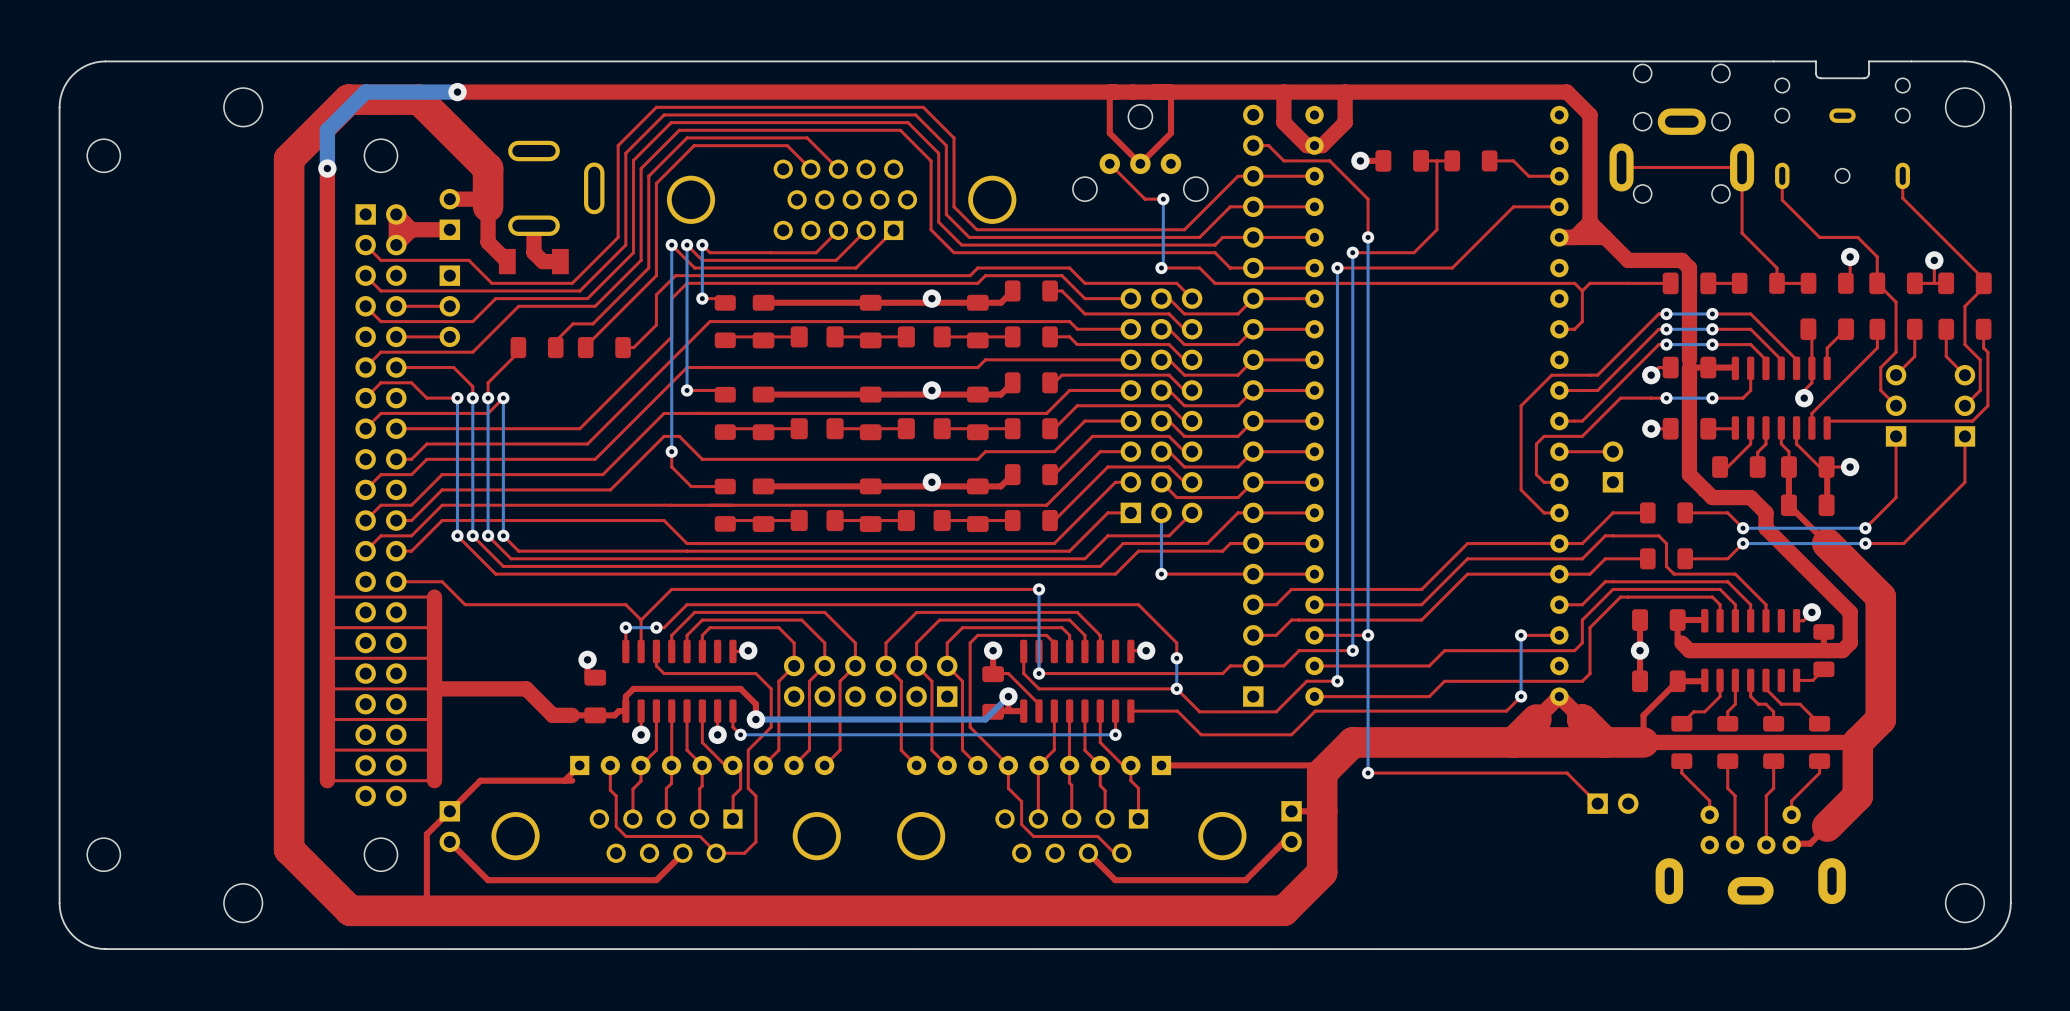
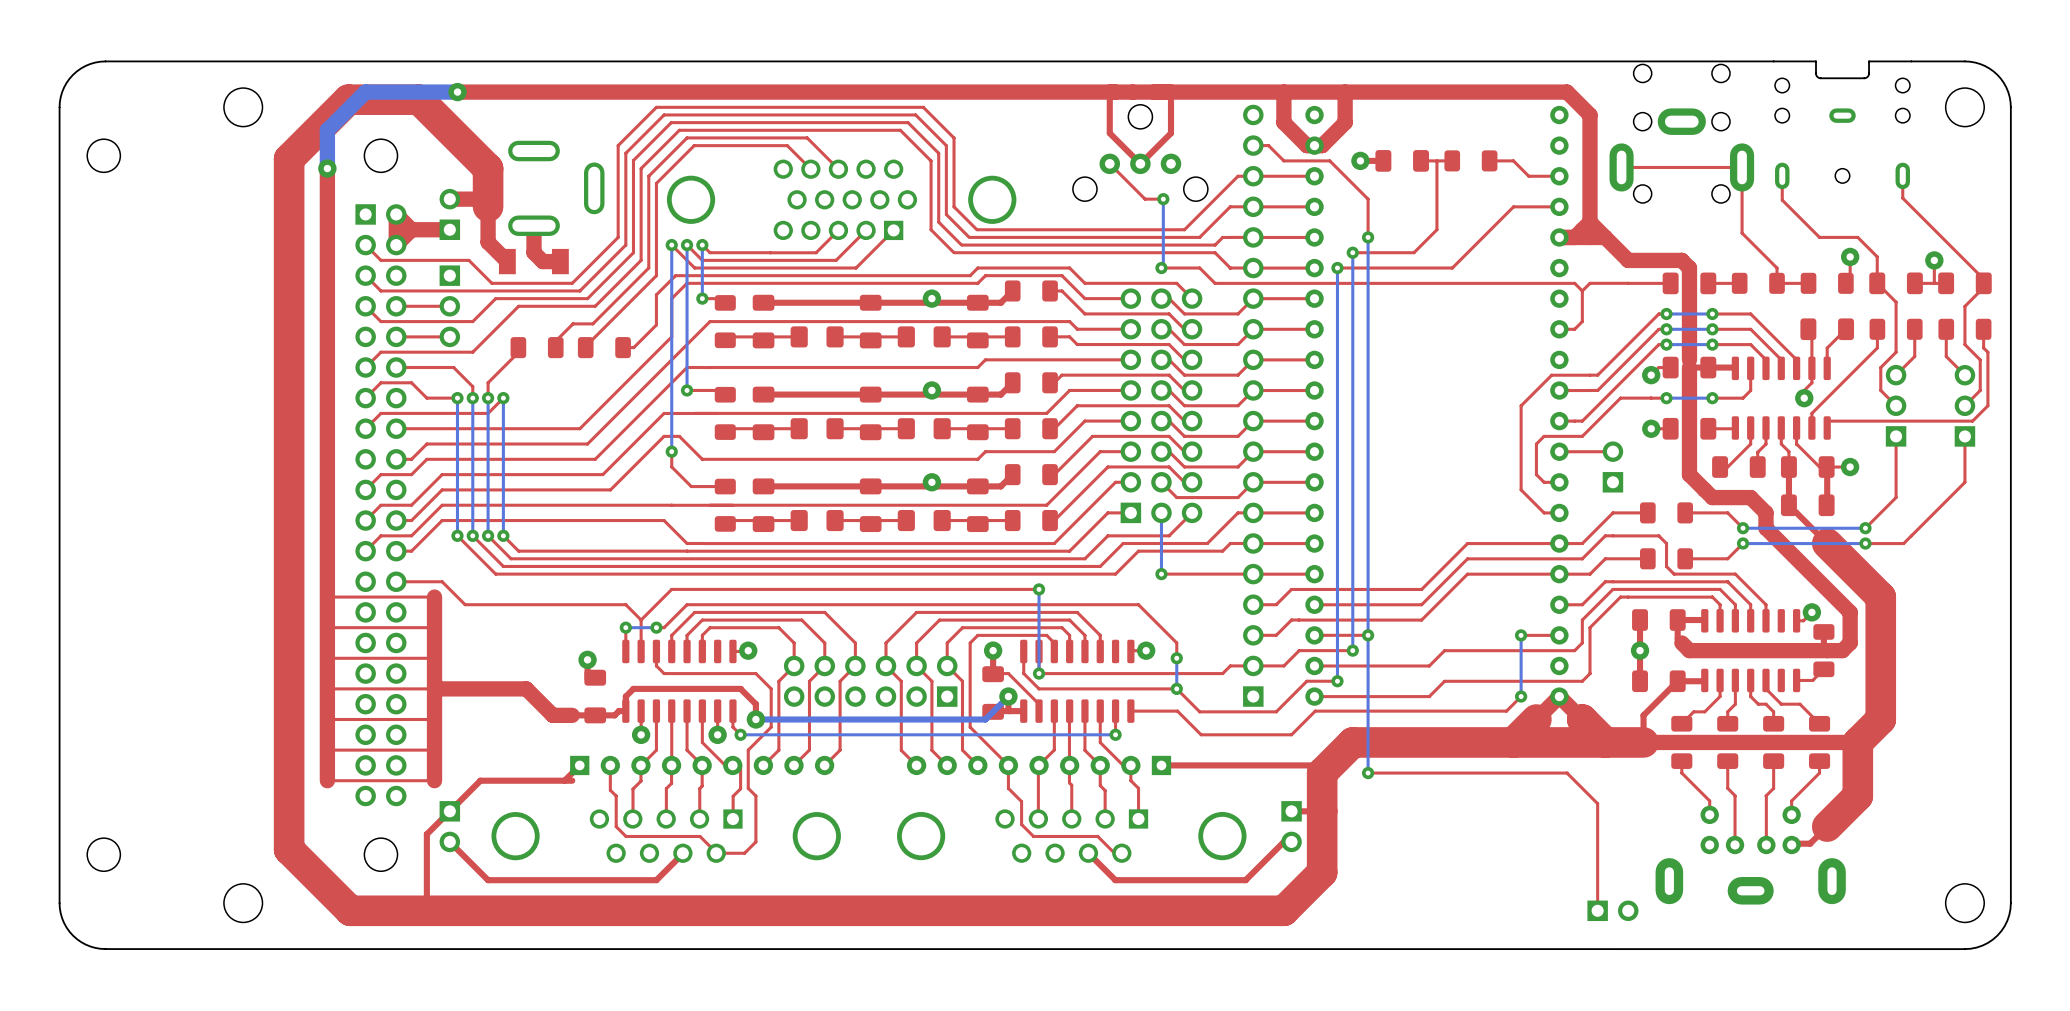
top track: none -> (1597, 803) (1597, 910)
part position: (1612, 803) -> (1612, 910)

